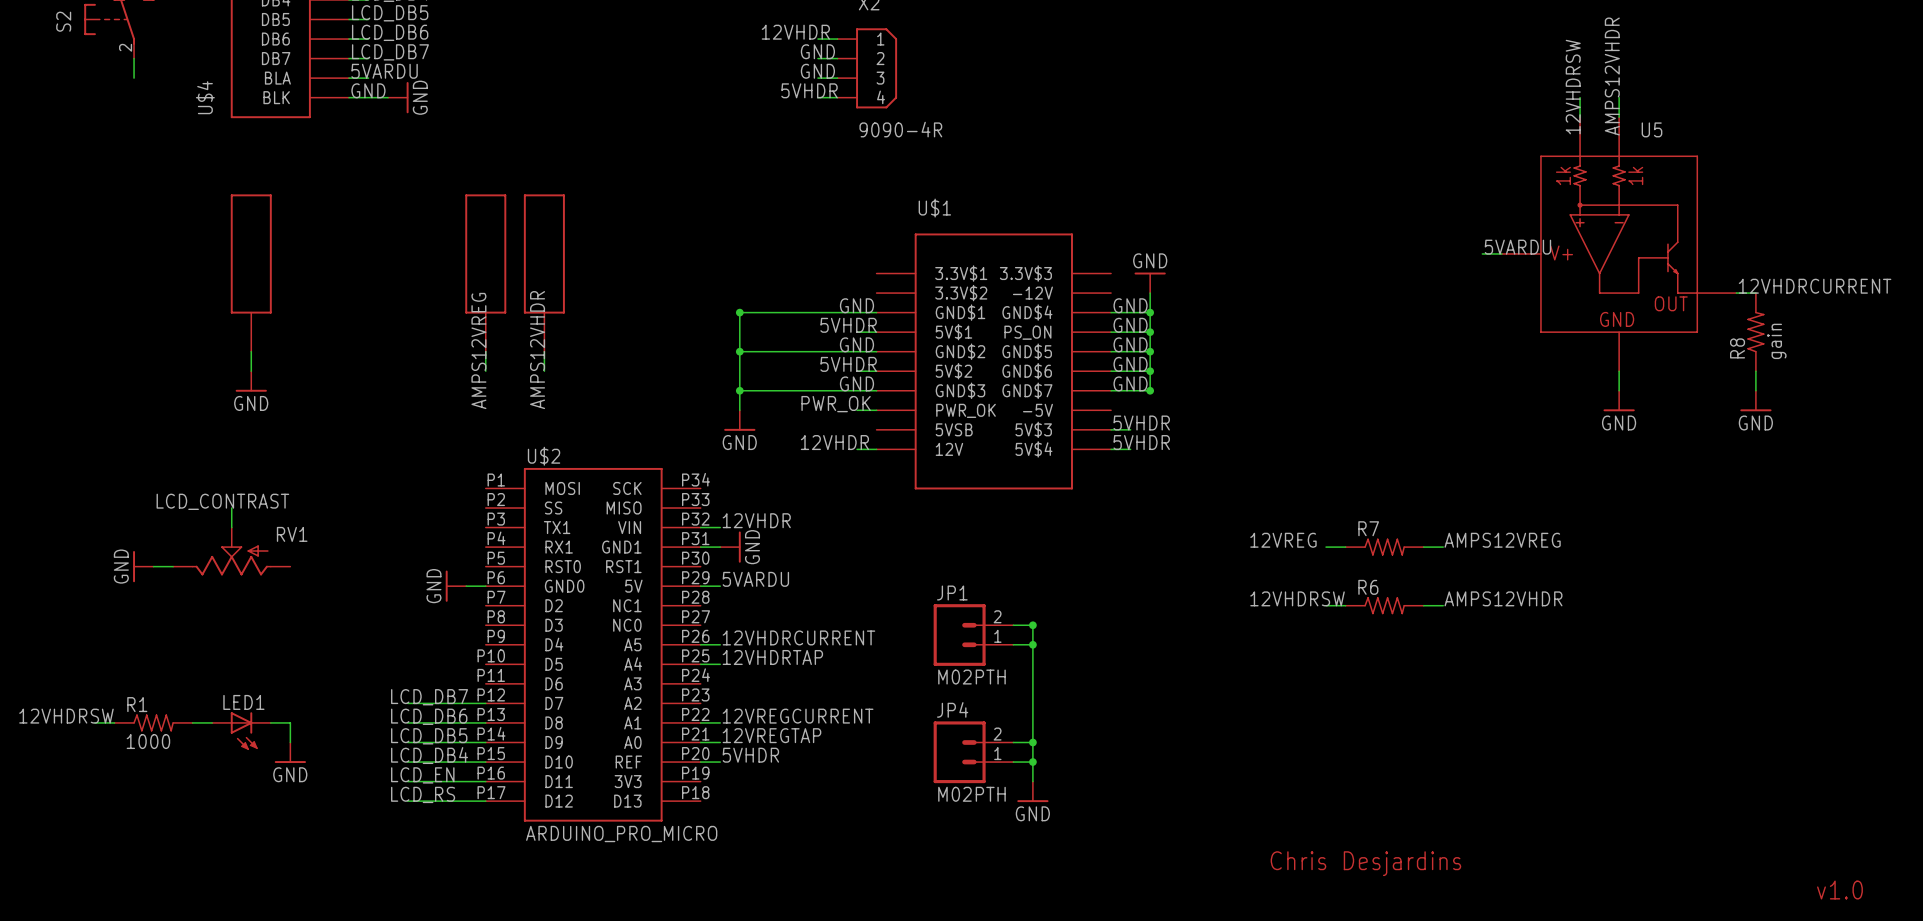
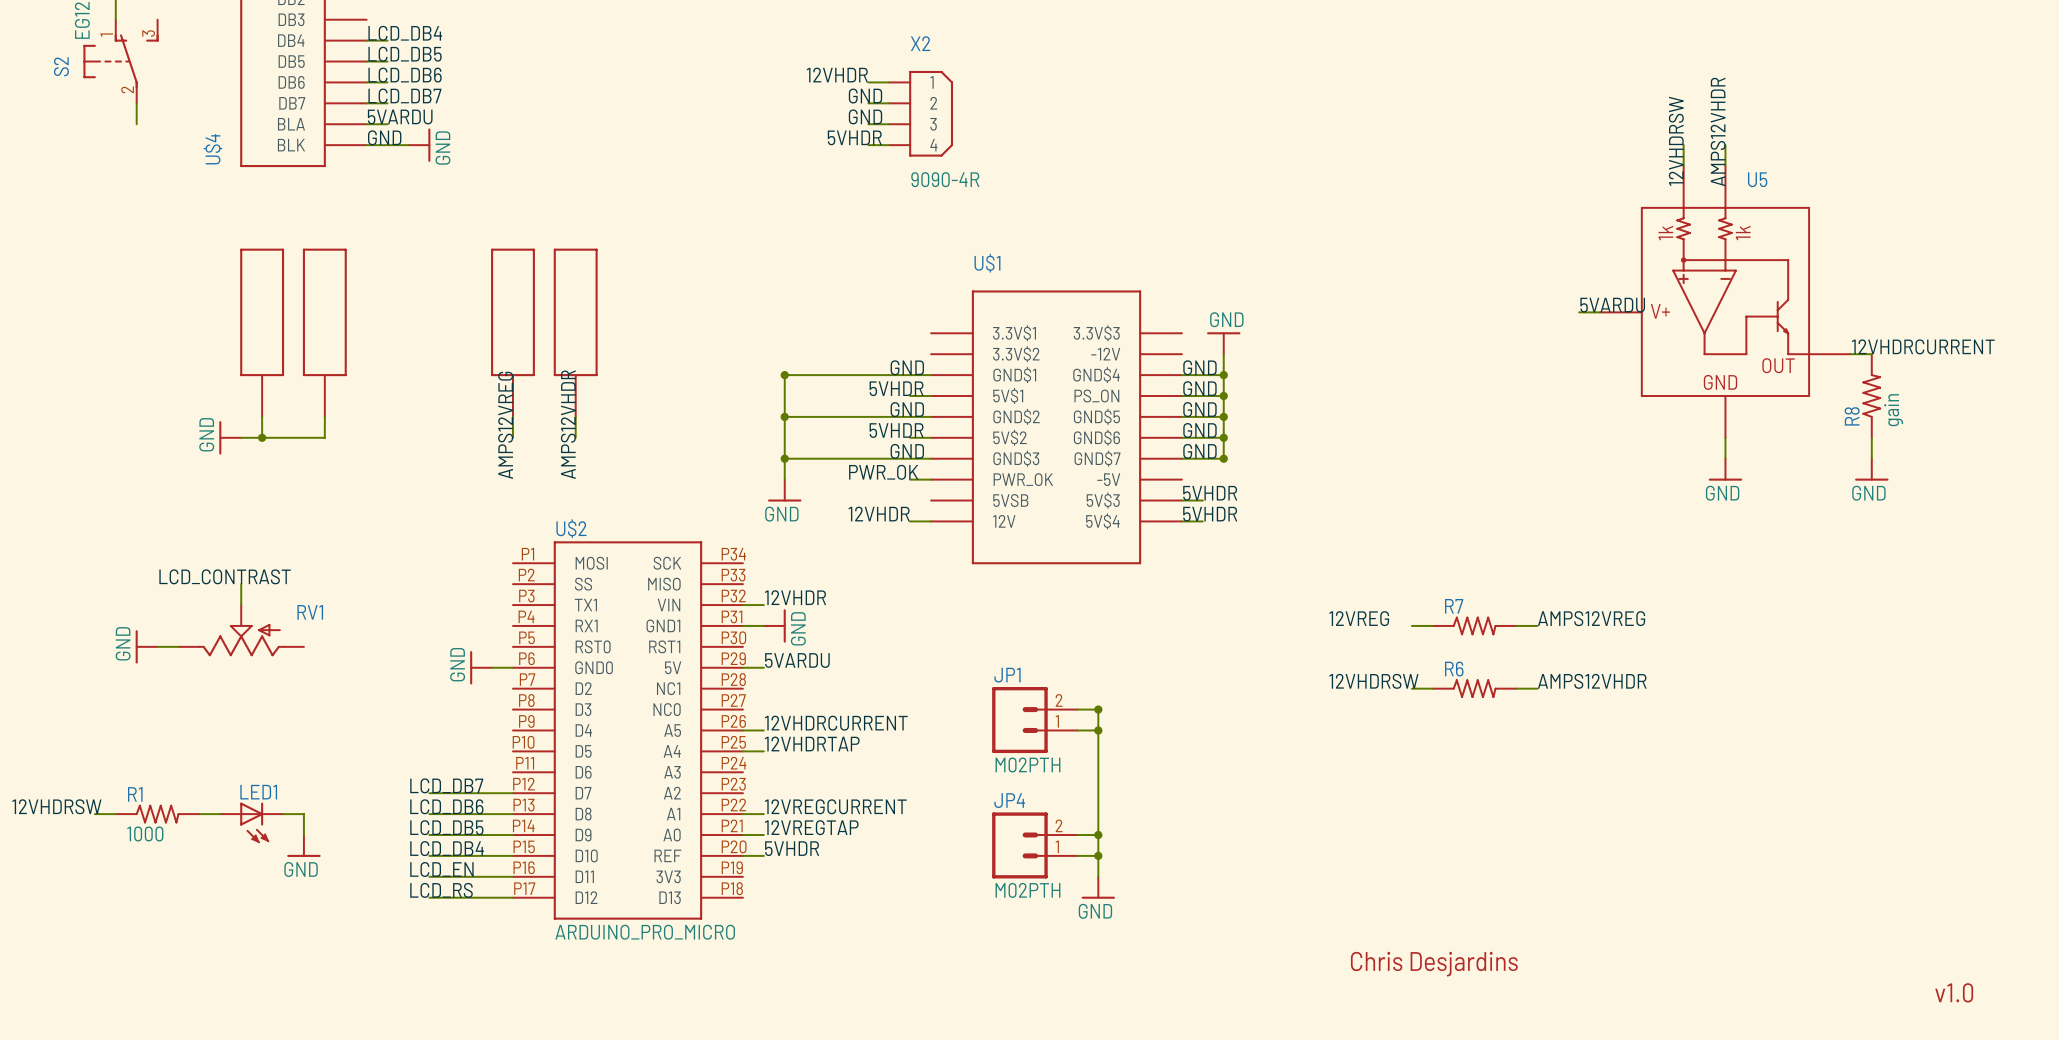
part: none -> (324, 332)
wire: none -> (324, 416) (324, 437) (241, 437)
junction: none -> (262, 437)
power symbol position: GND (251, 381) -> GND (230, 437)
power symbol rotation: 0° (251, 390) -> 90° clockwise (220, 437)

